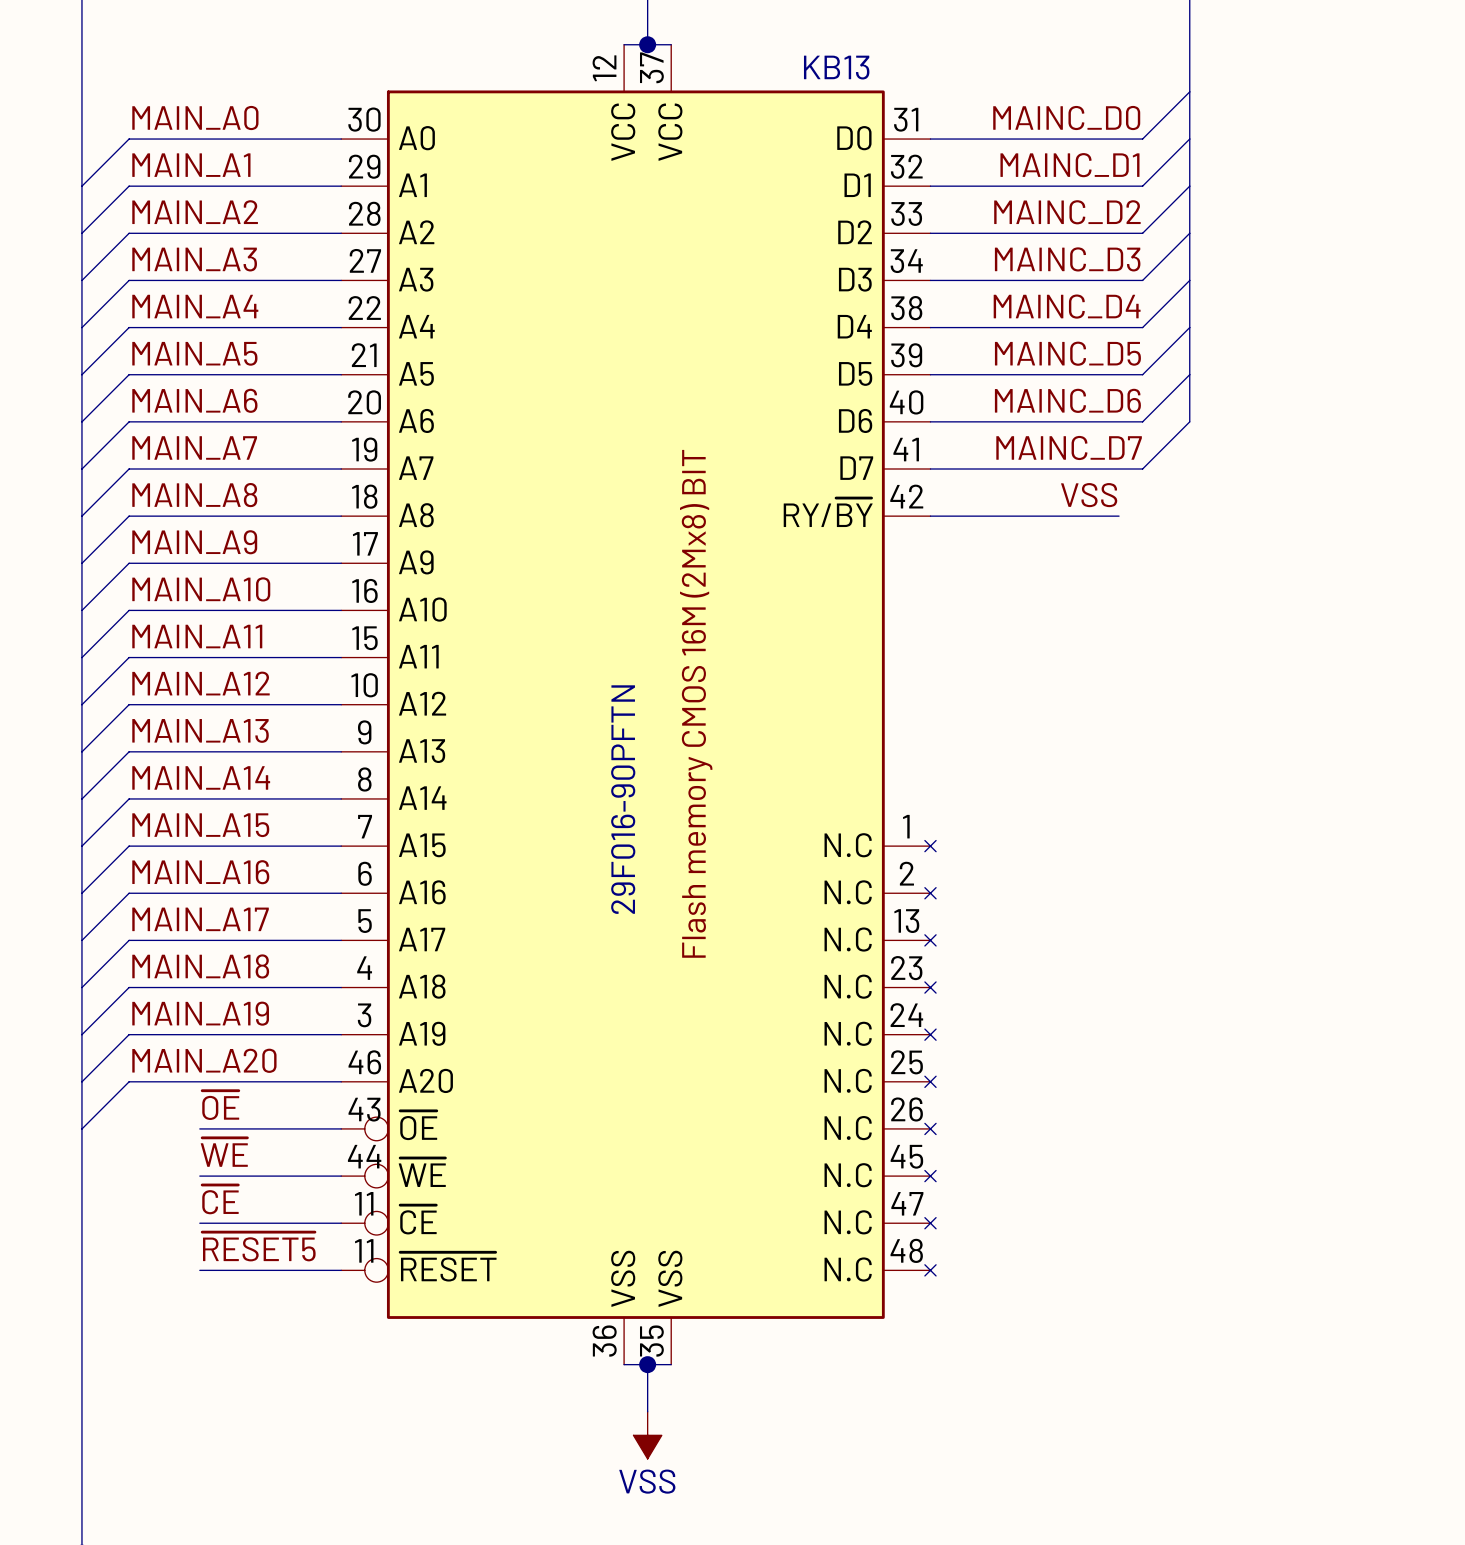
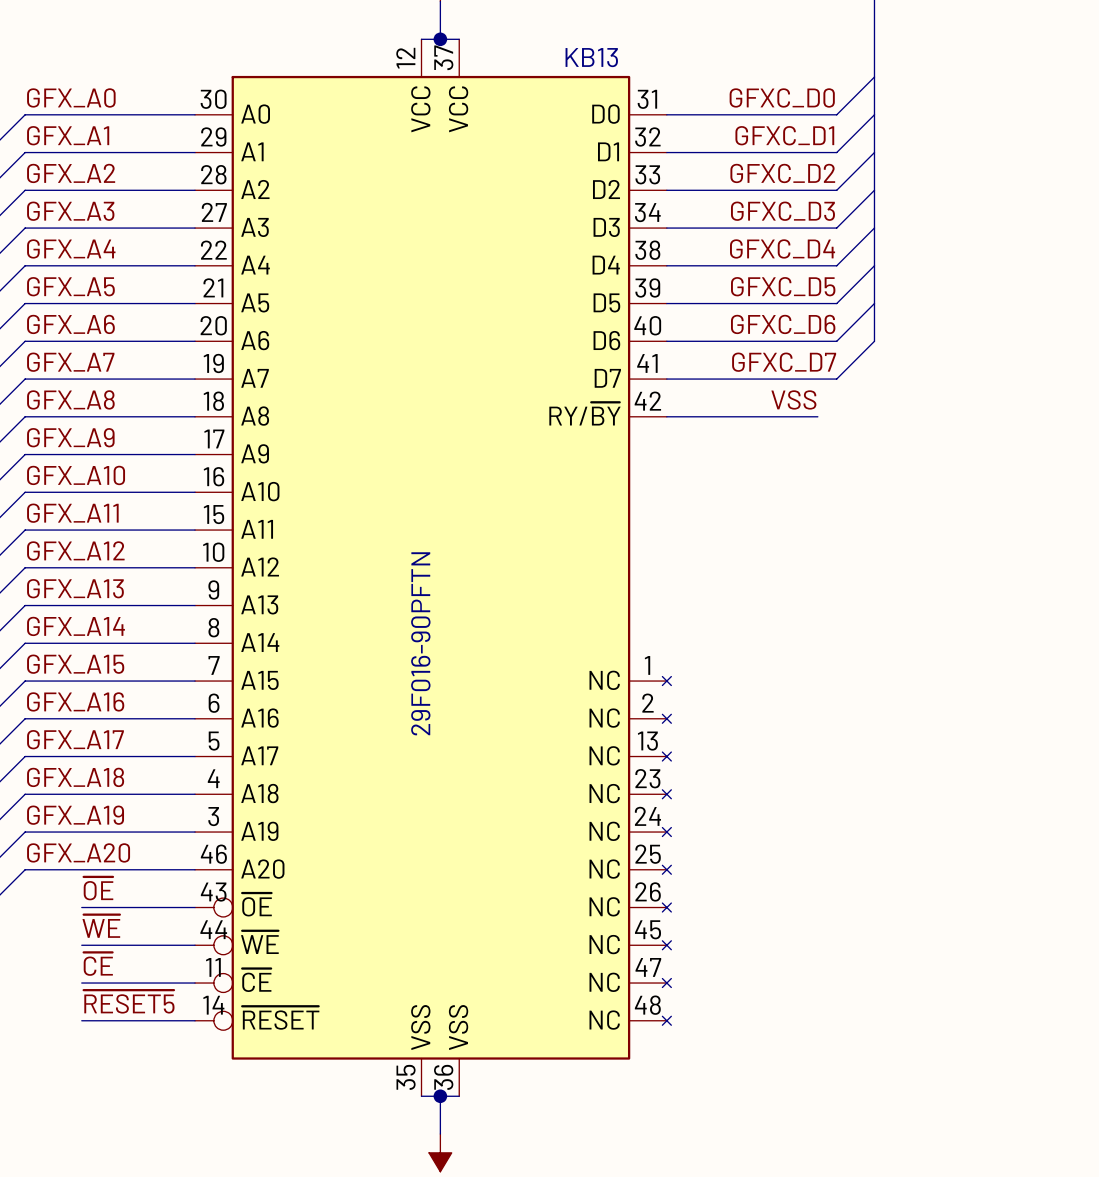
KB13 symbol: [341, 44, 937, 1365] -> [195, 39, 672, 1097]
label: MAIN_A0 (195, 118) -> GFX_A0 (71, 97)
label: MAINC_D0 (1066, 118) -> GFXC_D0 (782, 97)
label: MAIN_A1 (191, 165) -> GFX_A1 (68, 135)
label: MAINC_D1 (1069, 165) -> GFXC_D1 (784, 135)
label: MAIN_A2 (195, 212) -> GFX_A2 (71, 173)
label: MAINC_D2 (1067, 212) -> GFXC_D2 (782, 173)
label: MAIN_A3 (194, 259) -> GFX_A3 (70, 211)
label: MAINC_D3 (1067, 259) -> GFXC_D3 (782, 211)
label: MAIN_A4 (195, 306) -> GFX_A4 (71, 248)
label: MAINC_D4 (1067, 306) -> GFXC_D4 (782, 248)
label: MAIN_A5 (194, 353) -> GFX_A5 (70, 286)
label: MAINC_D5 (1067, 353) -> GFXC_D5 (783, 286)
label: MAIN_A6 (194, 400) -> GFX_A6 (70, 324)
label: MAINC_D6 (1067, 400) -> GFXC_D6 (783, 324)
label: MAIN_A7 (194, 447) -> GFX_A7 (70, 362)
label: MAINC_D7 (1069, 447) -> GFXC_D7 (784, 362)
label: MAIN_A8 (194, 495) -> GFX_A8 (70, 399)
label: MAIN_A9 (194, 542) -> GFX_A9 (70, 437)
label: MAIN_A10 (201, 589) -> GFX_A10 (76, 475)
label: MAIN_A11 (197, 636) -> GFX_A11 (72, 513)
label: MAIN_A12 (201, 683) -> GFX_A12 (75, 550)
label: MAIN_A13 (200, 730) -> GFX_A13 (75, 588)
label: MAIN_A14 (201, 777) -> GFX_A14 (76, 626)
label: MAIN_A15 (200, 825) -> GFX_A15 (75, 664)
label: MAIN_A16 (200, 872) -> GFX_A16 (75, 701)
label: MAIN_A17 (200, 919) -> GFX_A17 (75, 739)
label: MAIN_A18 (200, 966) -> GFX_A18 (75, 777)
label: MAIN_A19 (200, 1013) -> GFX_A19 (75, 815)
label: MAIN_A20 (204, 1060) -> GFX_A20 (78, 852)

